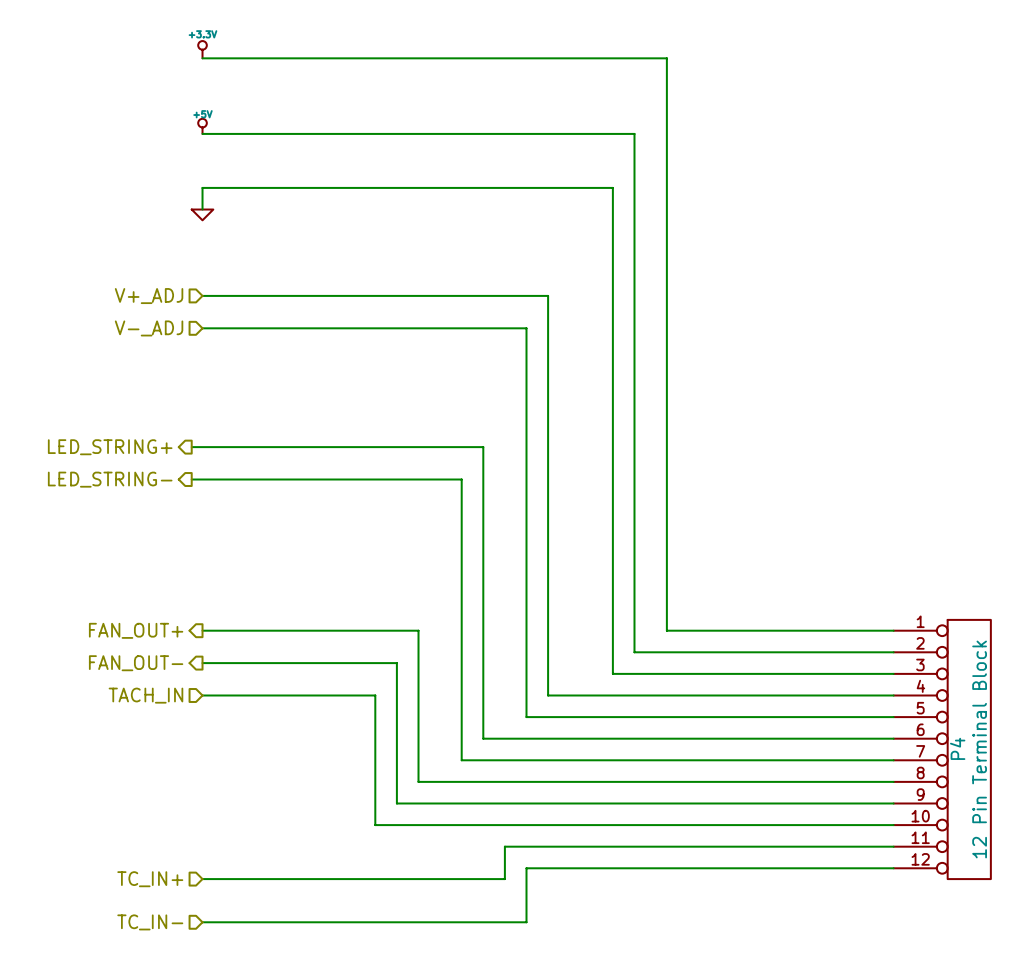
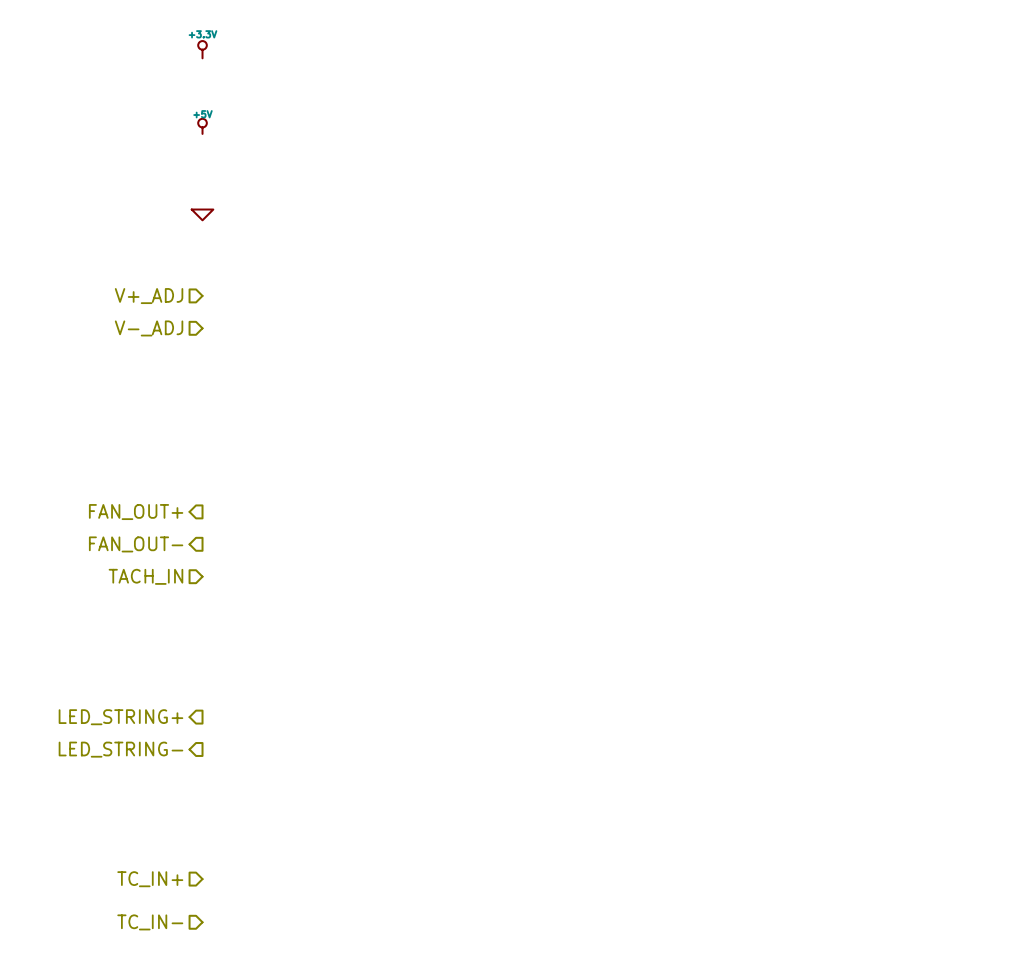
wire: (202, 58) (666, 58) (666, 630) (893, 630) -> none
wire: (202, 133) (634, 133) (634, 652) (893, 652) -> none
wire: (202, 209) (202, 187) (612, 187) (612, 673) (893, 673) -> none
wire: (202, 295) (548, 295) (548, 695) (893, 695) -> none
wire: (202, 328) (526, 328) (526, 717) (893, 717) -> none
hierarchical label: LED_STRING+ (110, 447) -> none
wire: (191, 447) (483, 447) (483, 738) (893, 738) -> none
hierarchical label: LED_STRING- (110, 479) -> none
wire: (191, 479) (461, 479) (461, 760) (893, 760) -> none
hierarchical label position: FAN_OUT+ (136, 630) -> FAN_OUT+ (136, 512)
wire: (202, 630) (418, 630) (418, 781) (893, 781) -> none
hierarchical label position: FAN_OUT- (136, 663) -> FAN_OUT- (136, 544)
wire: (202, 663) (396, 663) (396, 803) (893, 803) -> none
hierarchical label position: TACH_IN (145, 695) -> TACH_IN (145, 576)
wire: (202, 695) (375, 695) (375, 825) (893, 825) -> none
hierarchical label: none -> LED_STRING+ (120, 717)
hierarchical label: none -> LED_STRING- (120, 749)
P4: 12 Pin Terminal Block (942, 749) -> none
wire: (893, 846) (504, 846) (504, 879) (202, 879) -> none
wire: (893, 868) (526, 868) (526, 922) (202, 922) -> none

